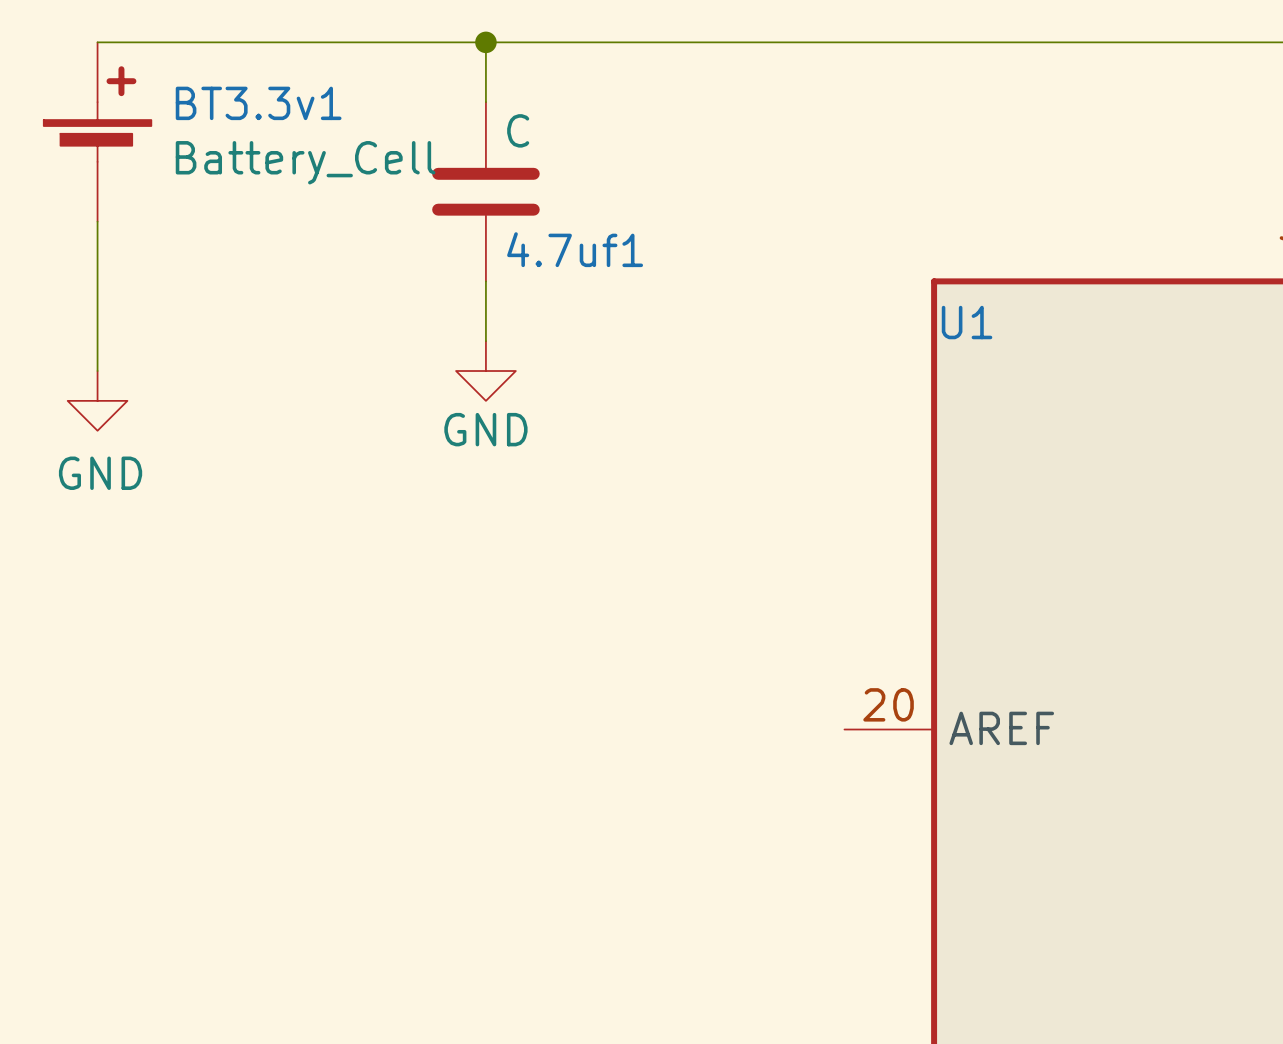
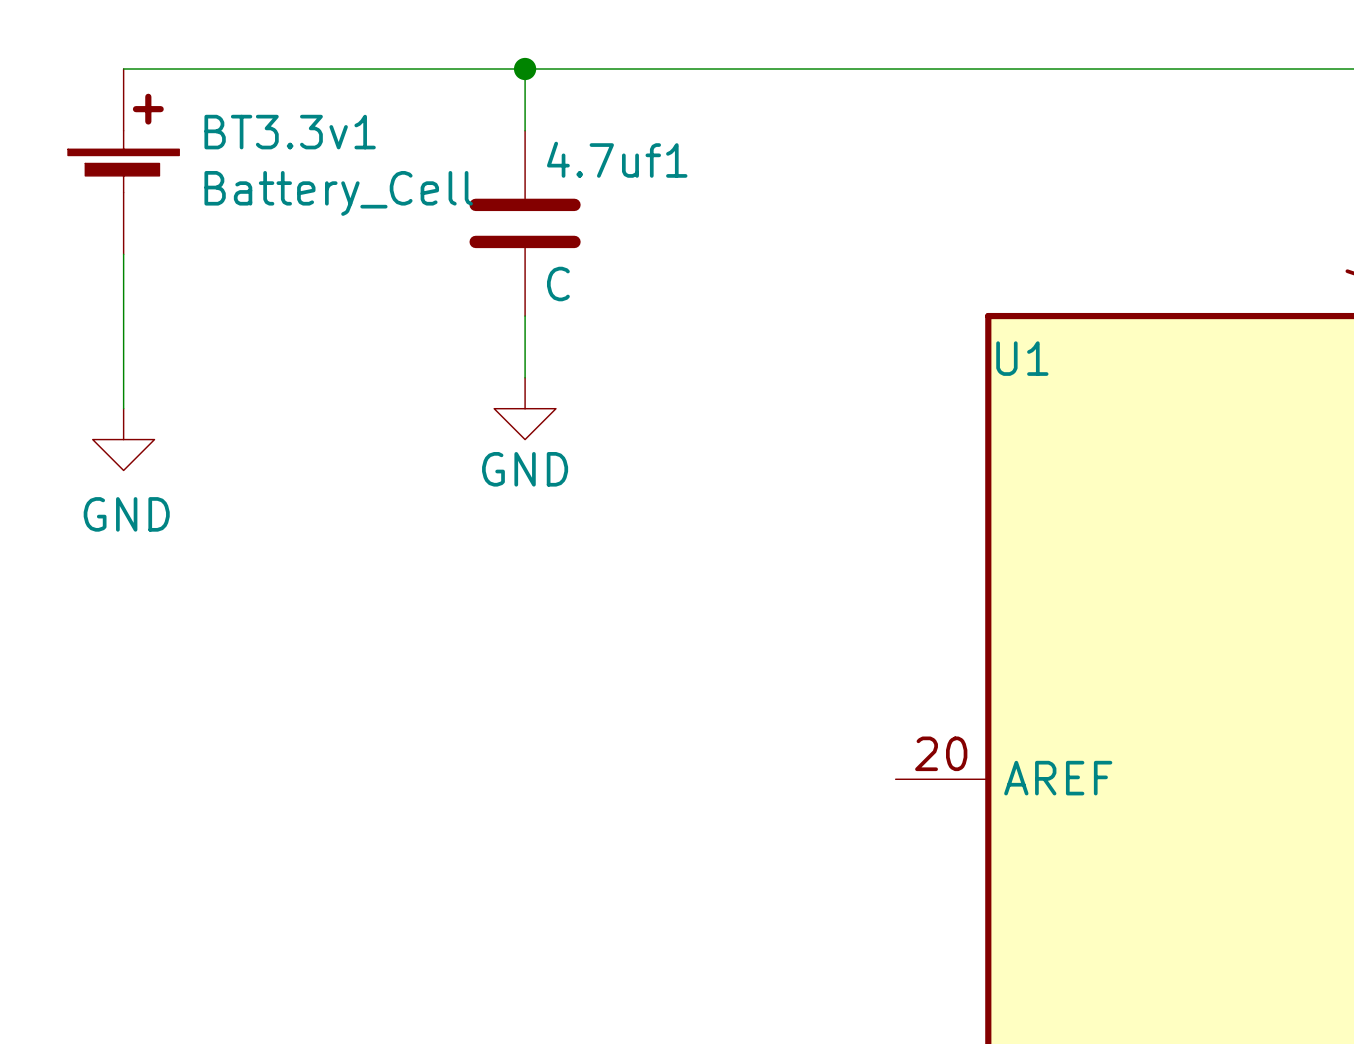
4.7uf1 value: C (518, 130) -> 4.7uf1 (617, 159)
4.7uf1 name: 4.7uf1 (575, 249) -> C (558, 284)

